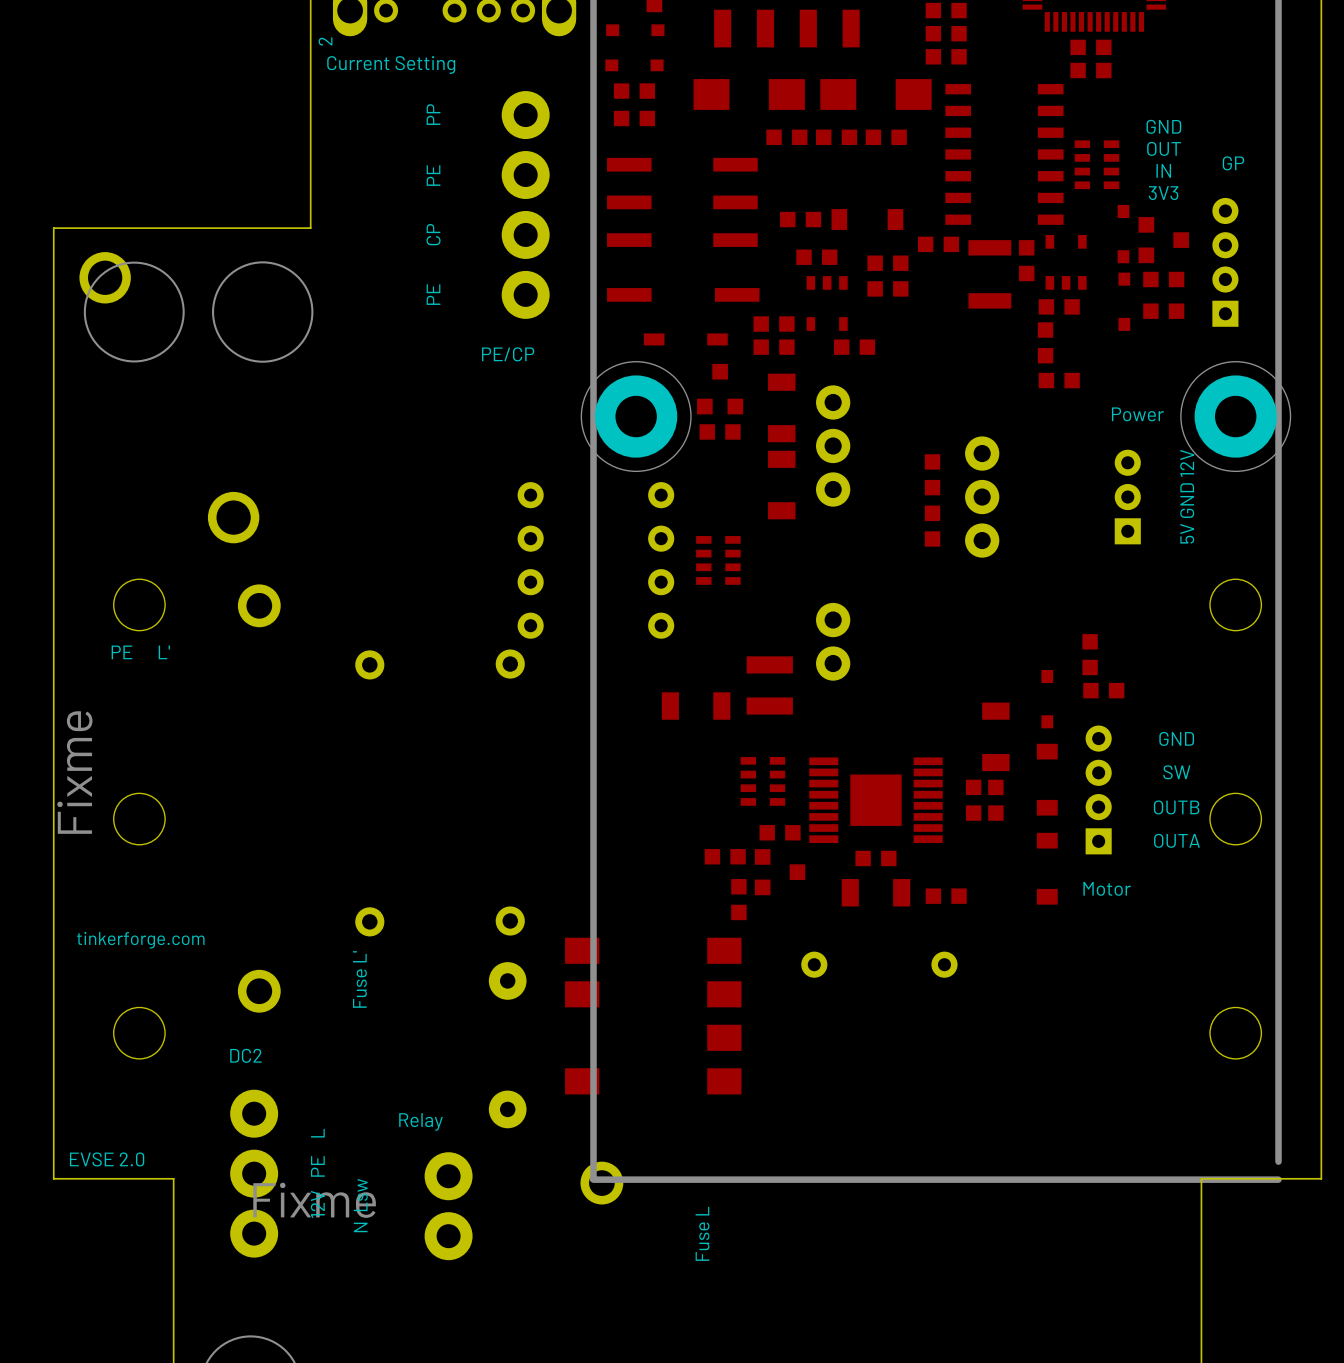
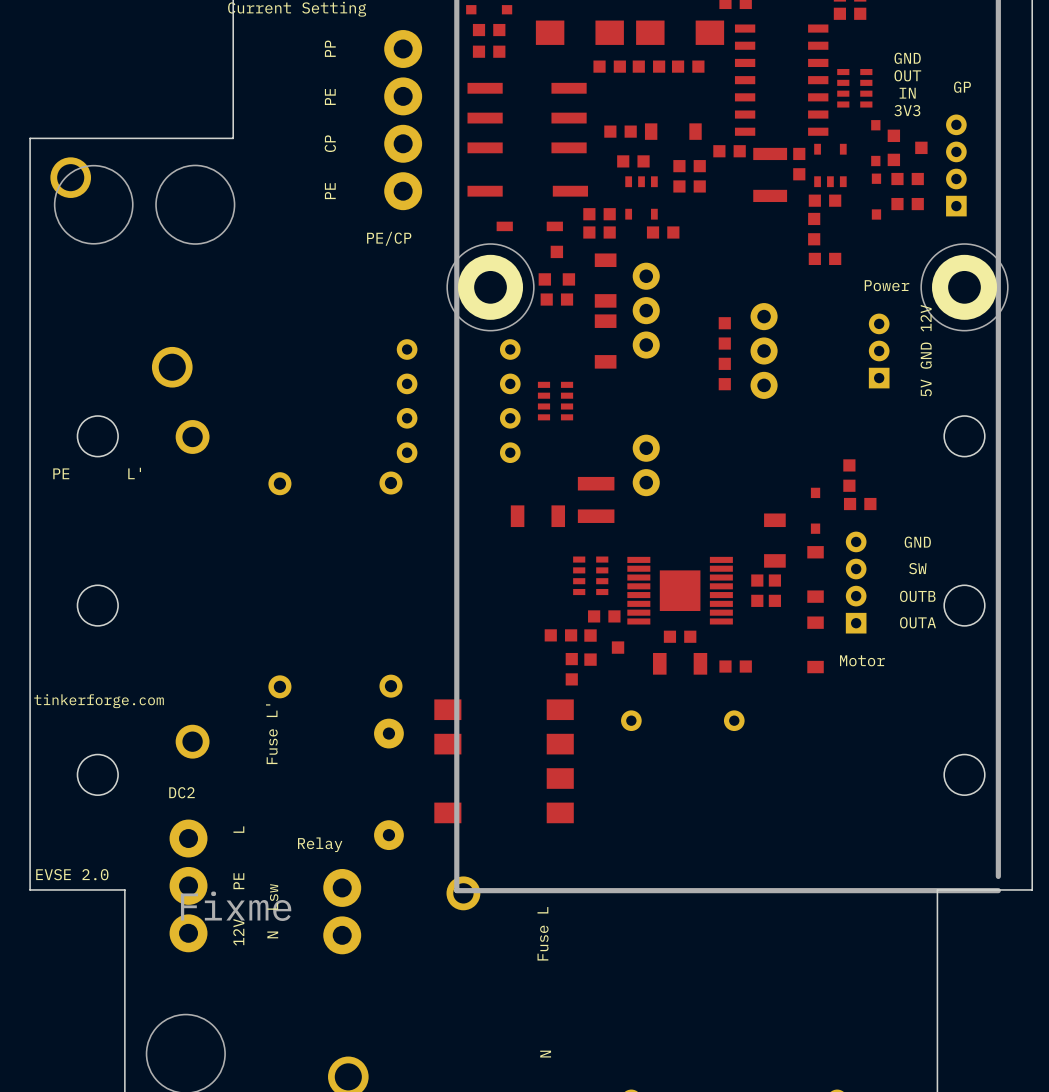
text: Fixme (74, 772) -> none

